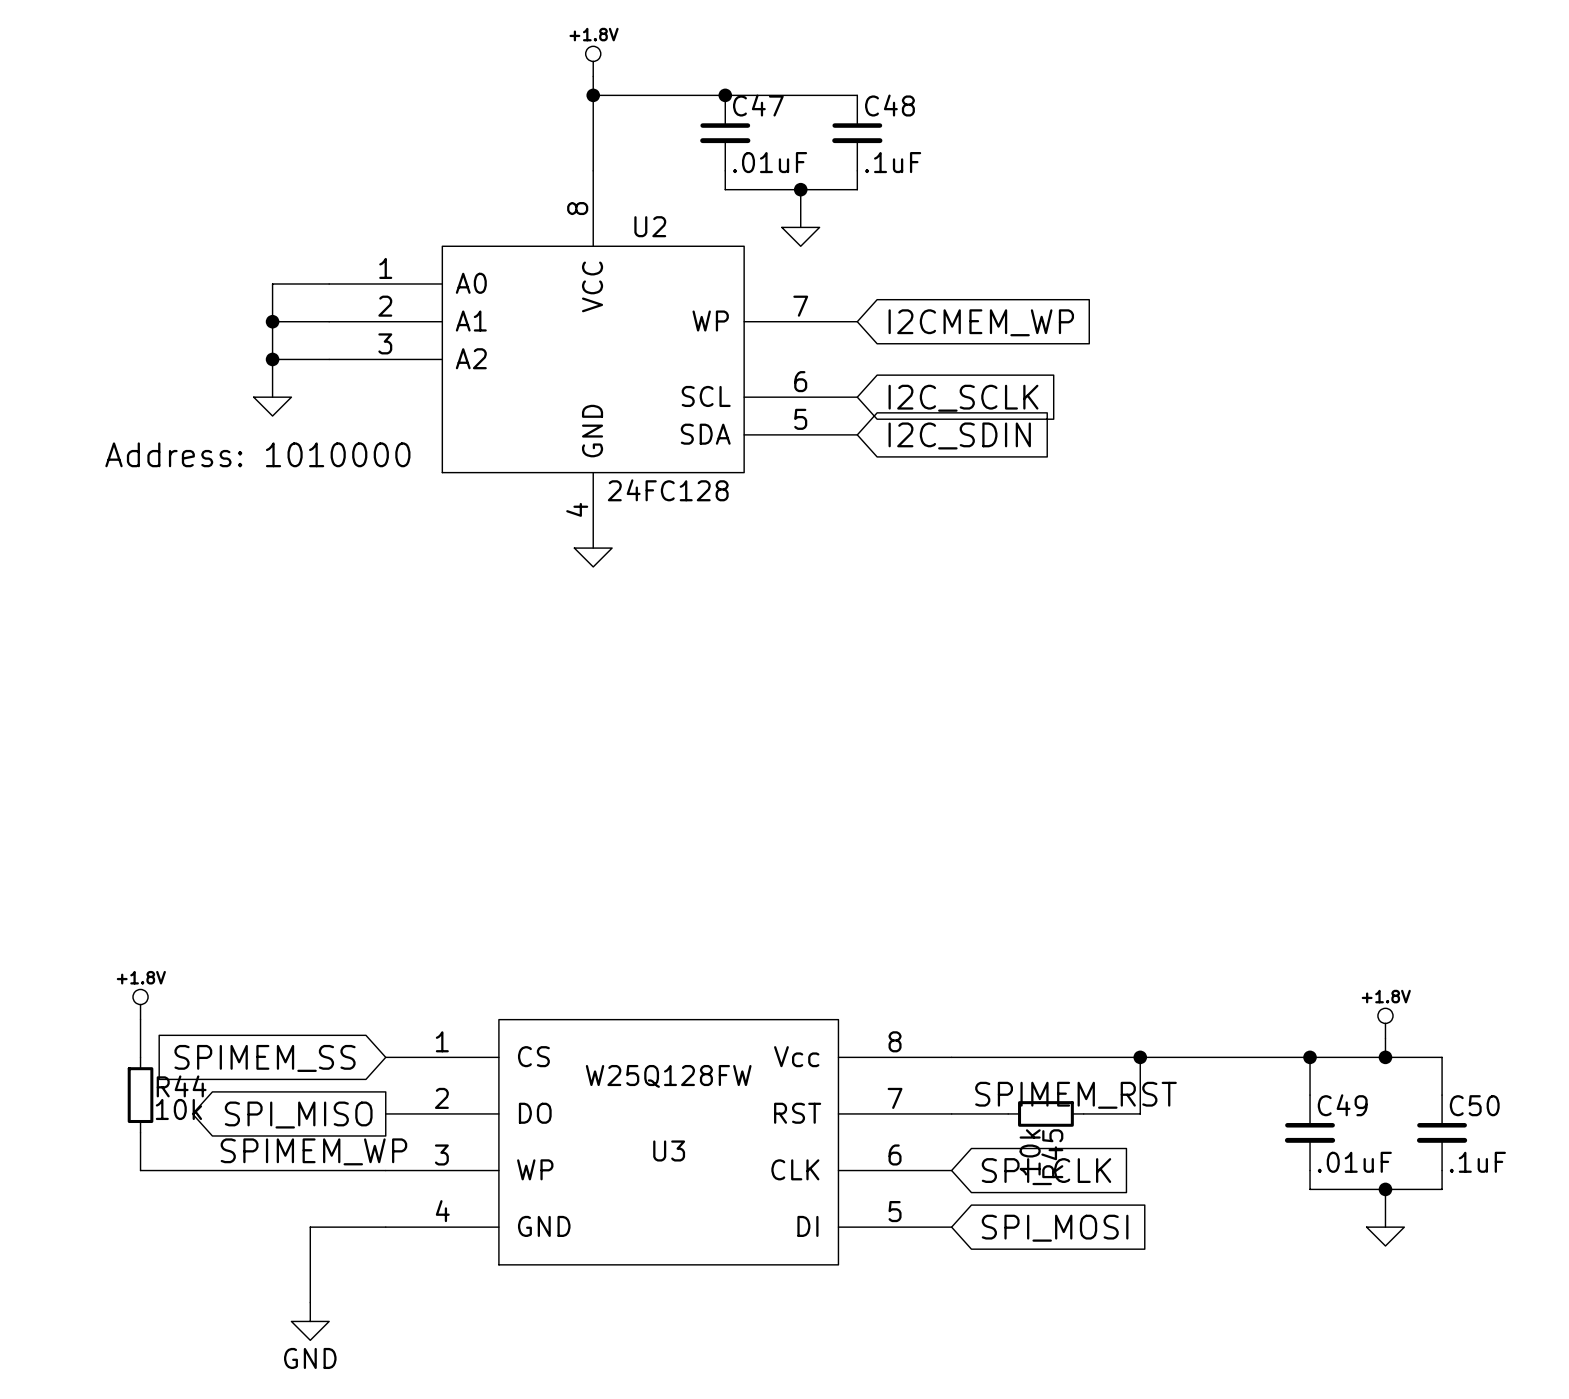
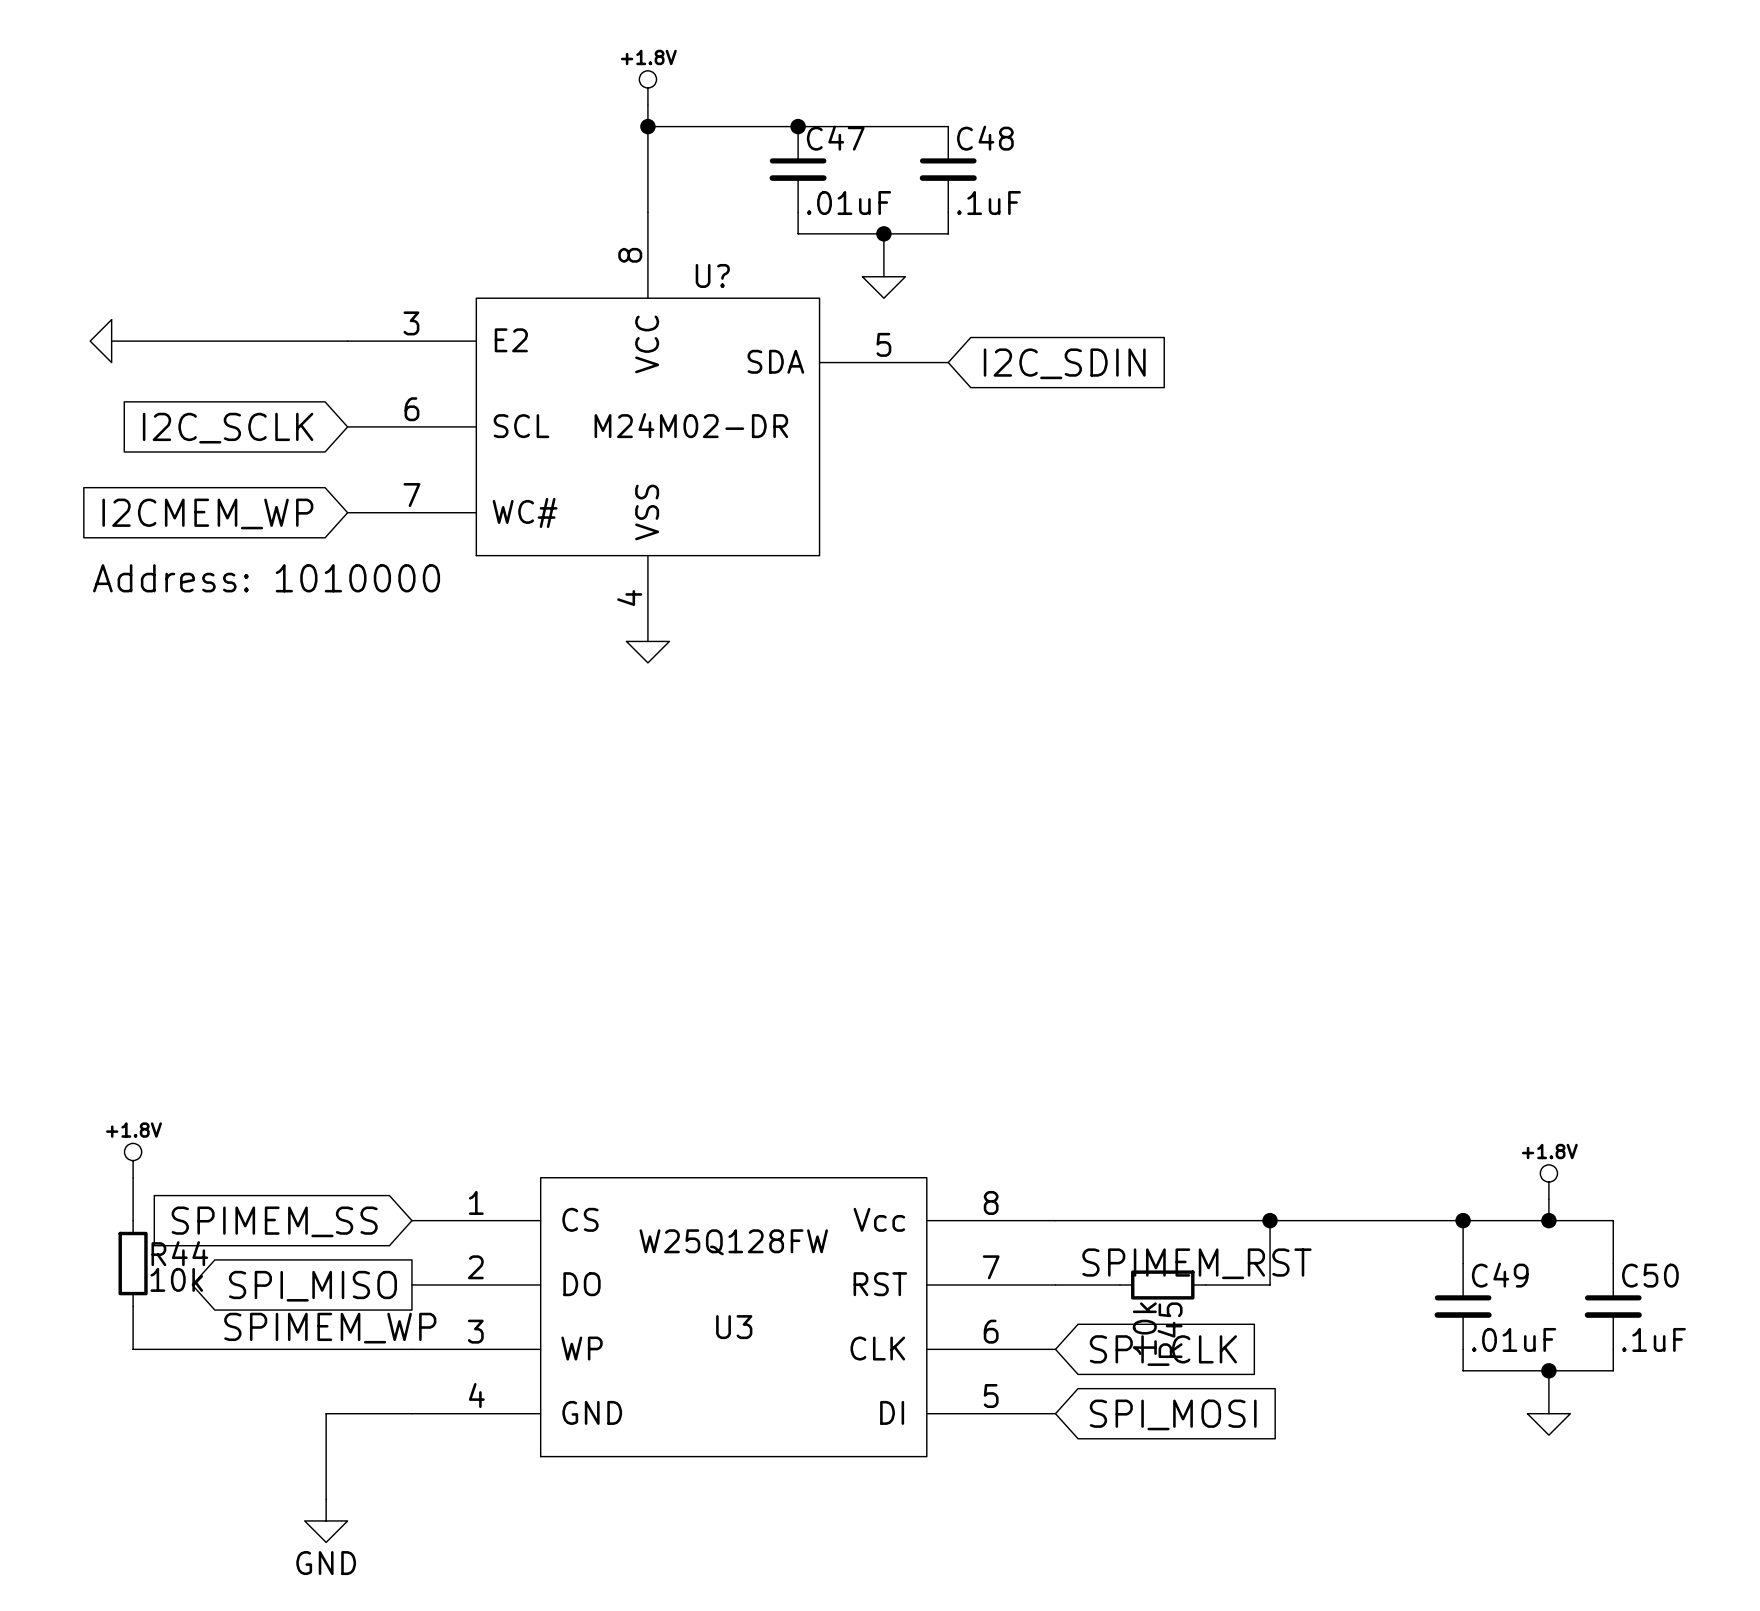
wire: (272, 283) (272, 397) -> (283, 341) (111, 341)
wire: (272, 321) (329, 321) -> none
junction: (272, 321) -> none
global label: I2CMEM_WP (981, 322) -> none
wire: (272, 359) (329, 359) -> none
junction: (272, 359) -> none
U2: 24FC128 (593, 359) -> none
U?: none -> M24M02-DR (647, 426)
global label: none -> I2C_SCLK (228, 428)
global label: I2C_SCLK (963, 398) -> none
power symbol rotation: 0° (272, 406) -> 90° clockwise (100, 341)
power symbol position: (272, 406) -> (100, 341)
global label: none -> I2CMEM_WP (207, 513)
global label position: I2C_SDIN (959, 435) -> I2C_SDIN (1064, 363)
text position: Address: 1010000 (257, 454) -> Address: 1010000 (266, 578)

